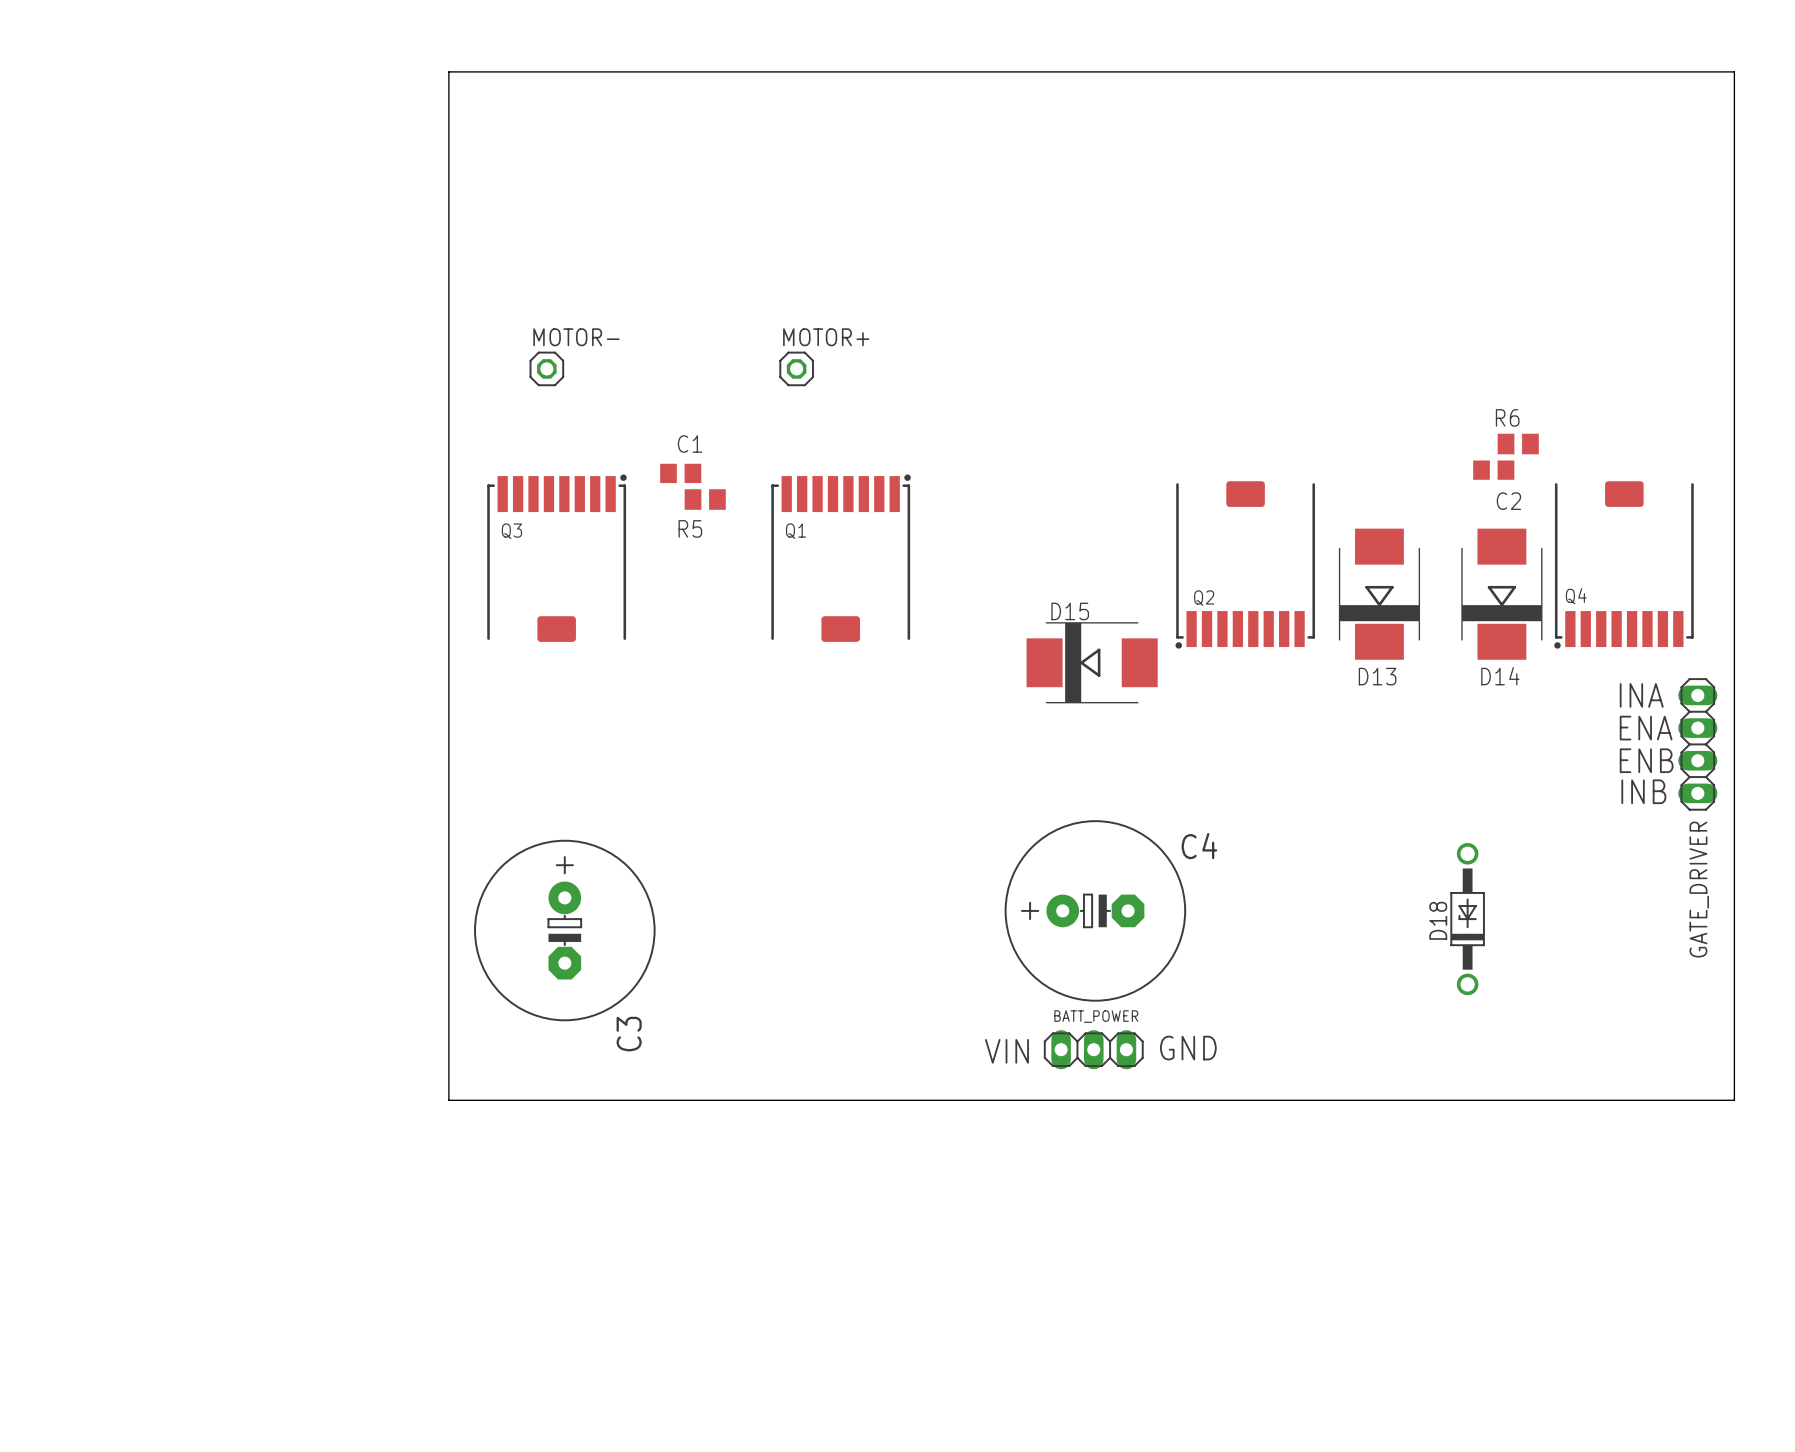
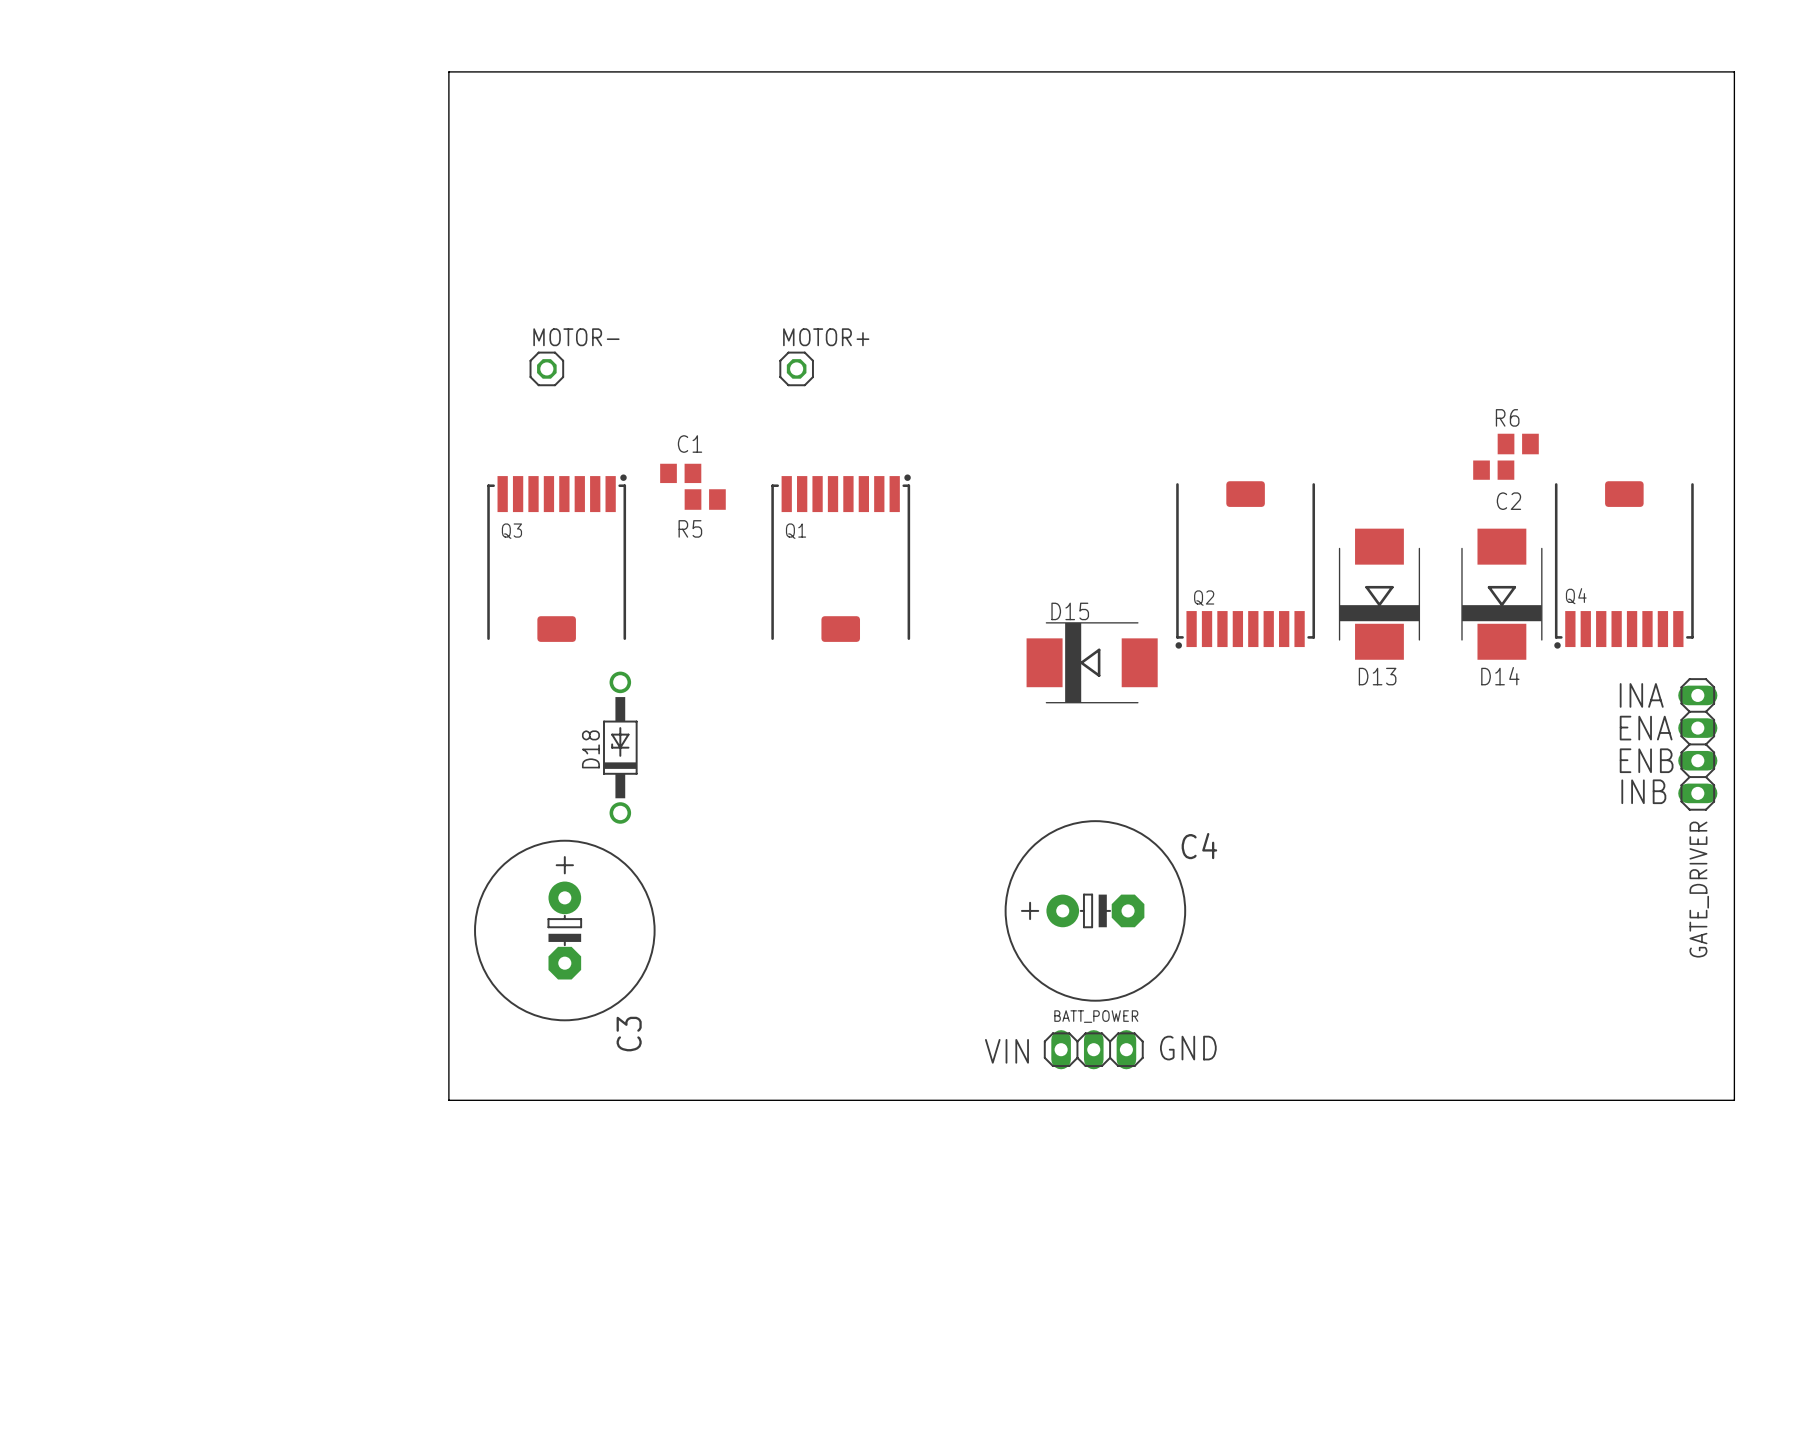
D18 position: (1467, 919) -> (620, 747)

